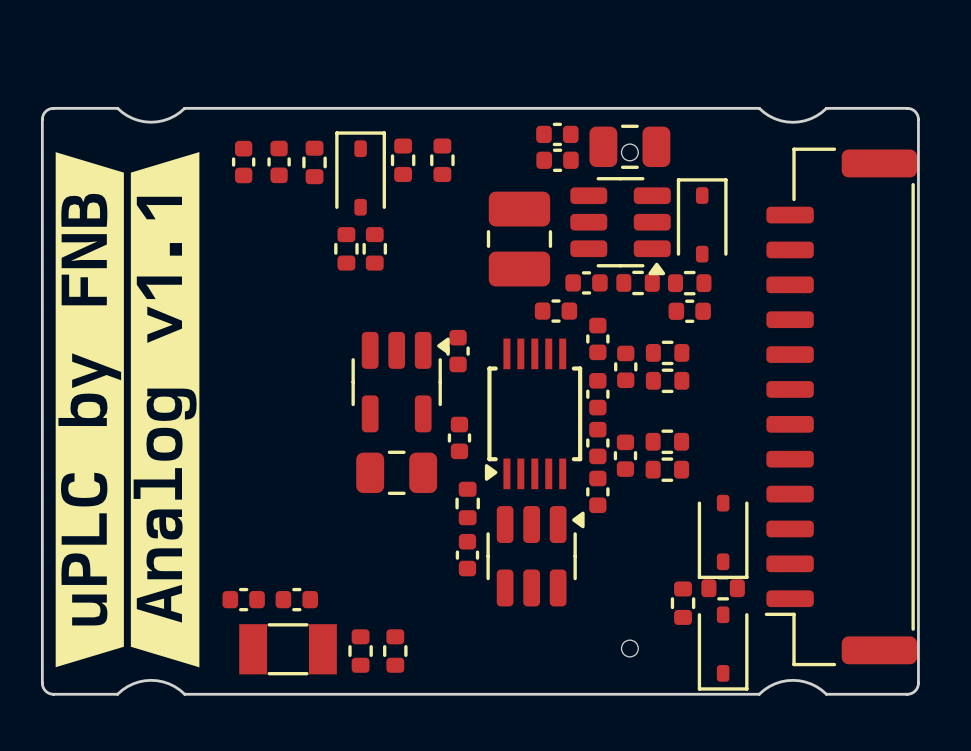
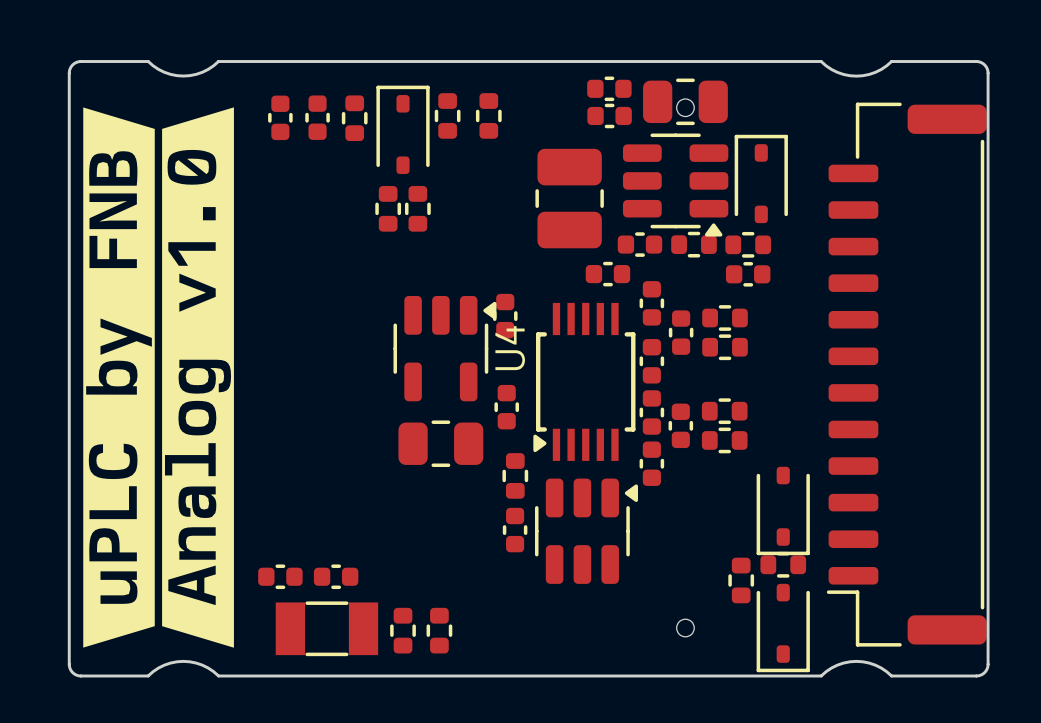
drawing shape: [130, 152, 200, 668] -> [162, 107, 234, 648]
U4 name: none -> U4 (510, 348)

